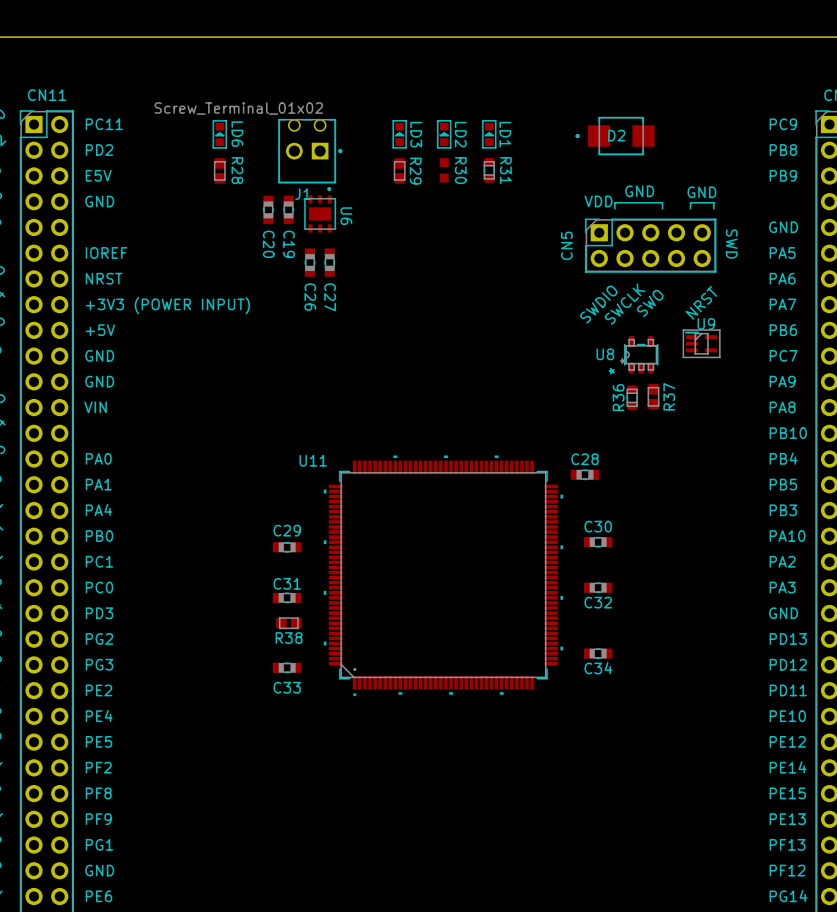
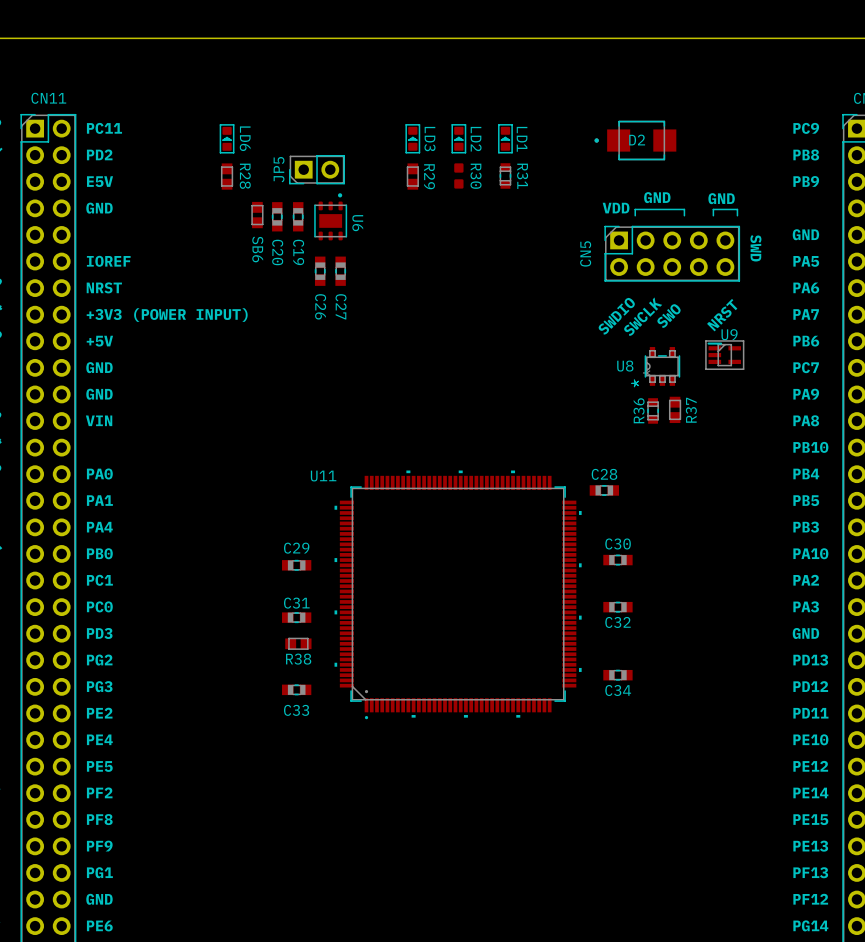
J1: Screw_Terminal_01x02 (310, 151) -> none
JP5: none -> (317, 169)
SB6: none -> (257, 215)

